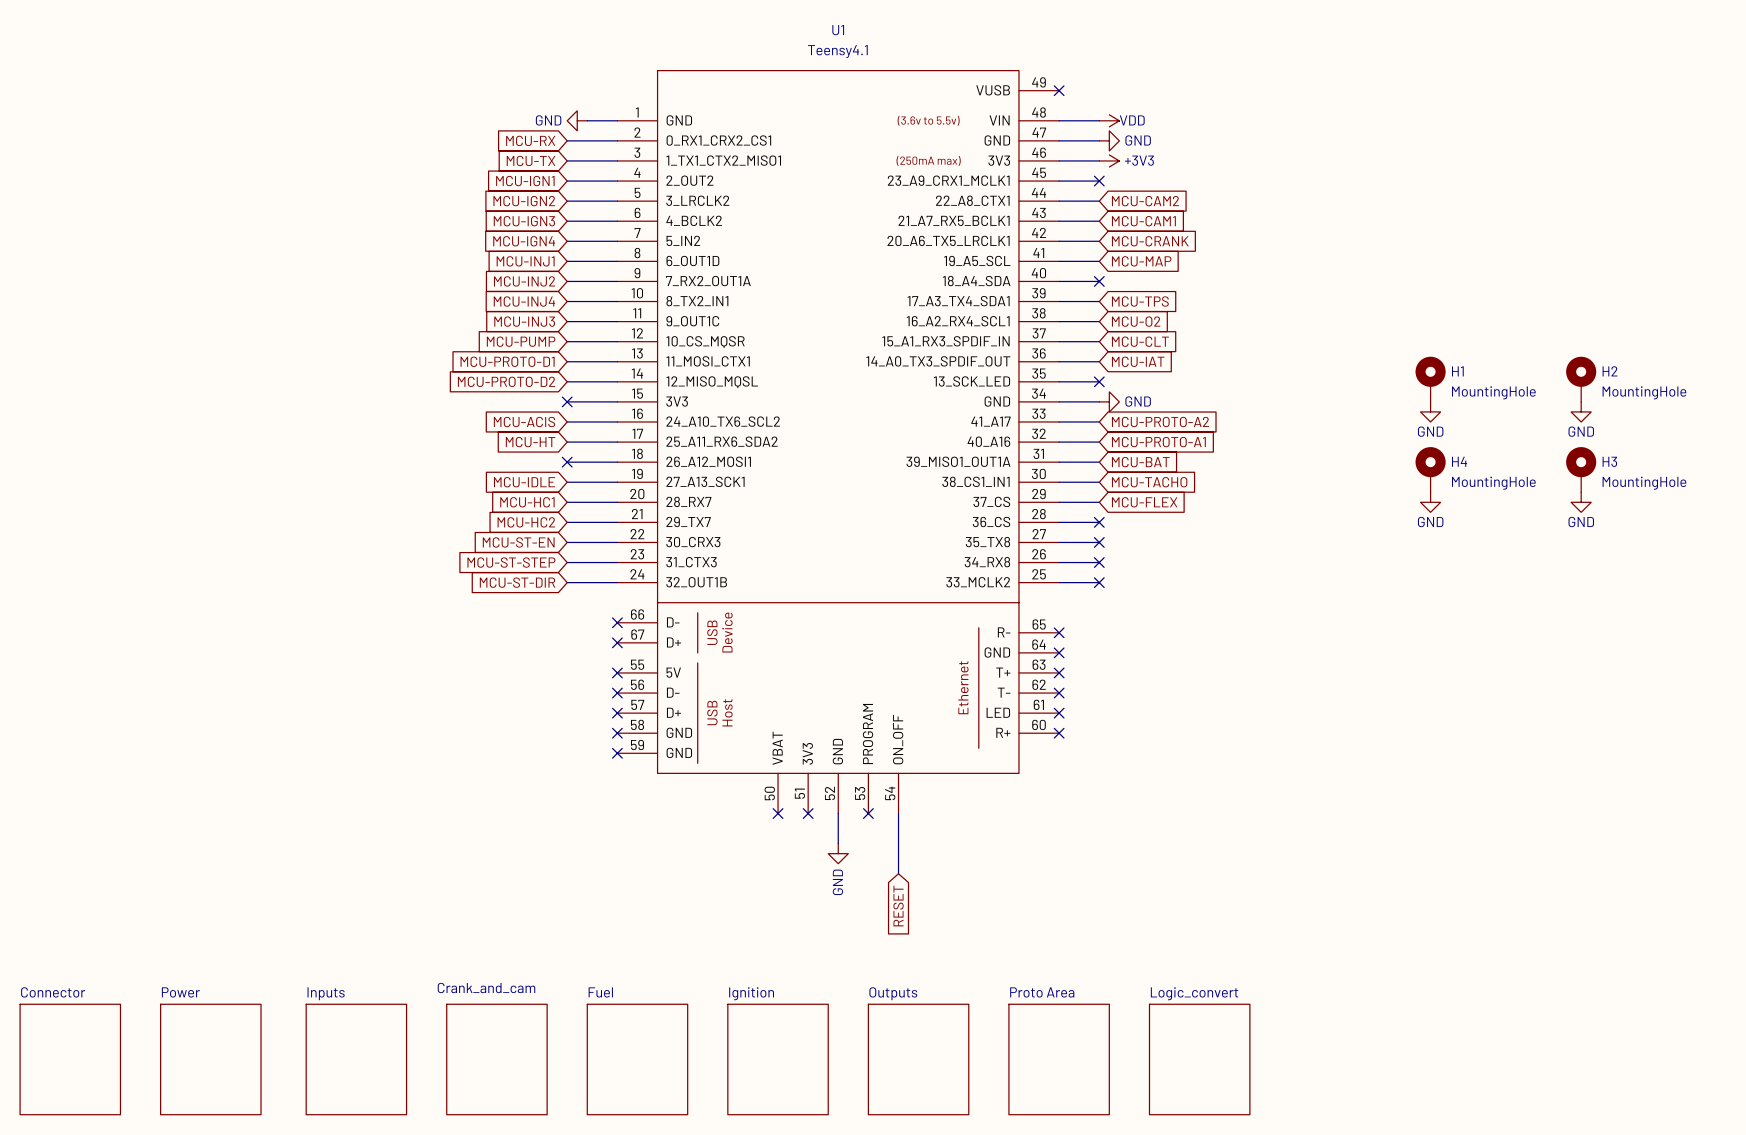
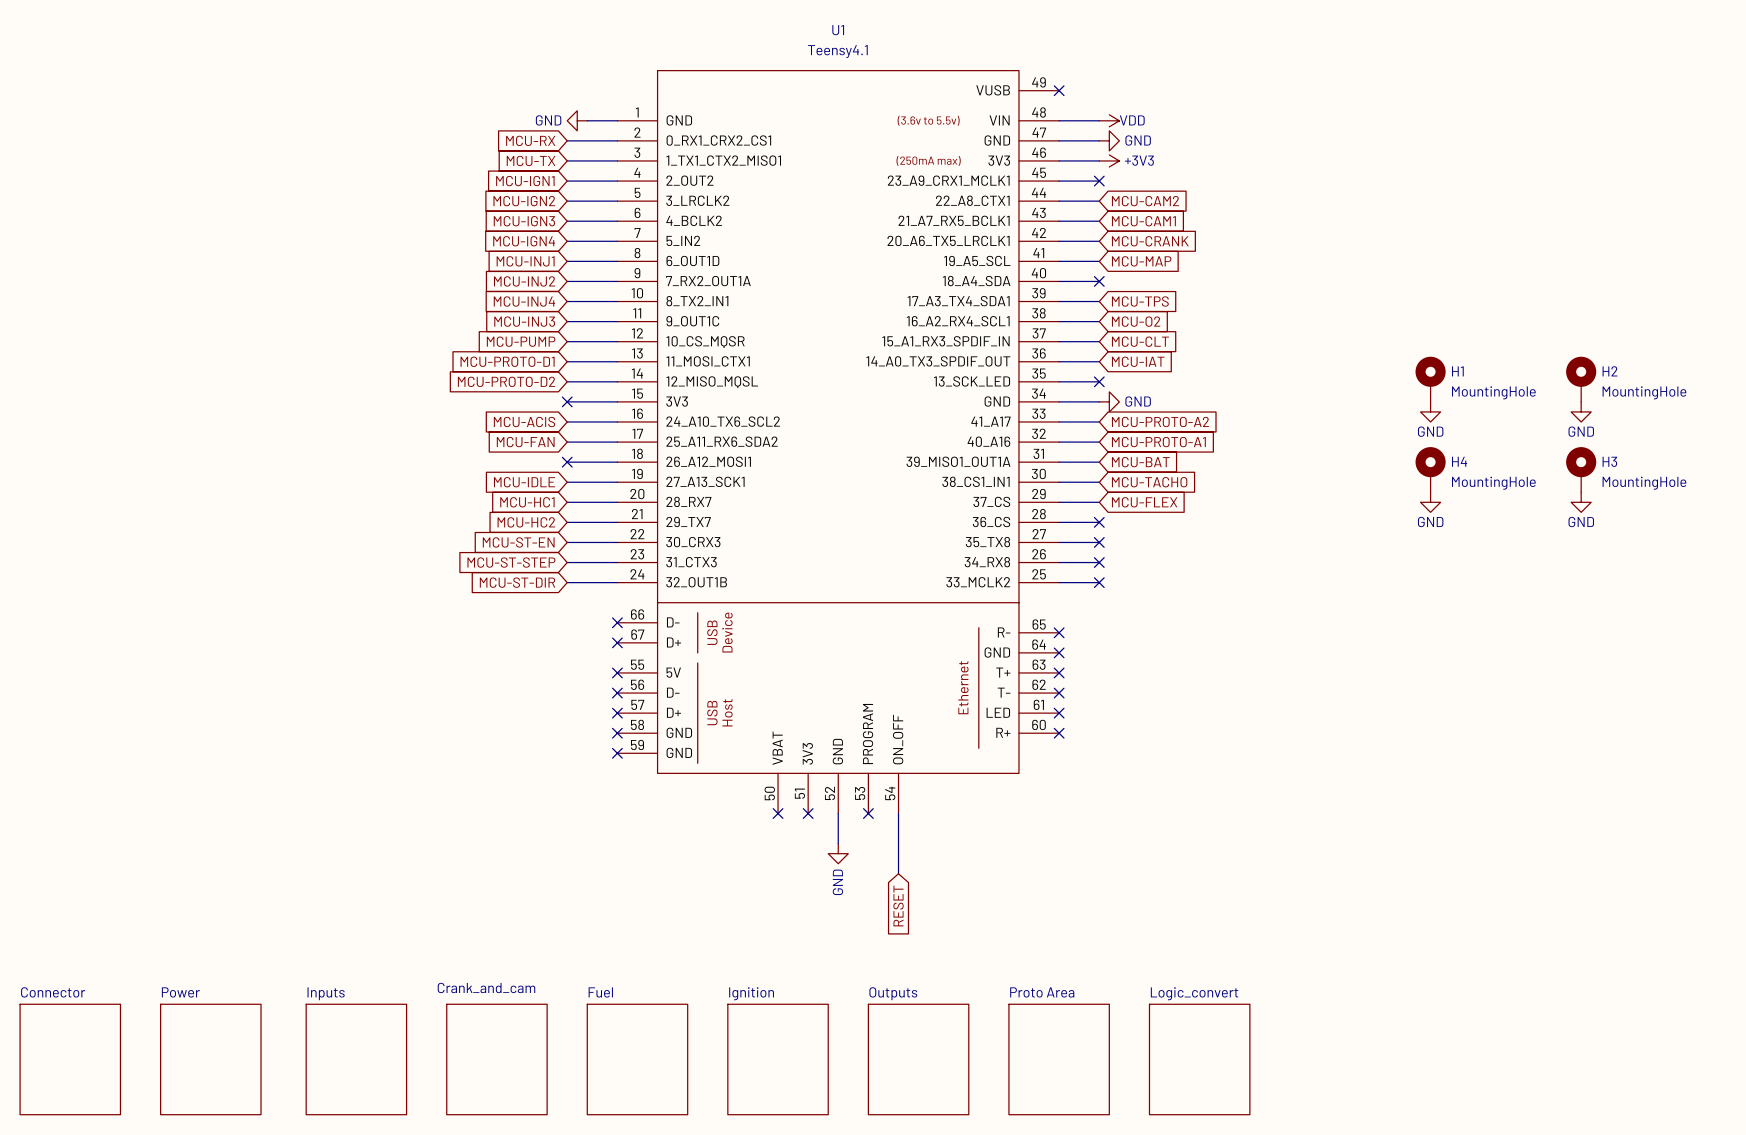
global label: MCU-HT (530, 442) -> MCU-FAN (525, 442)

